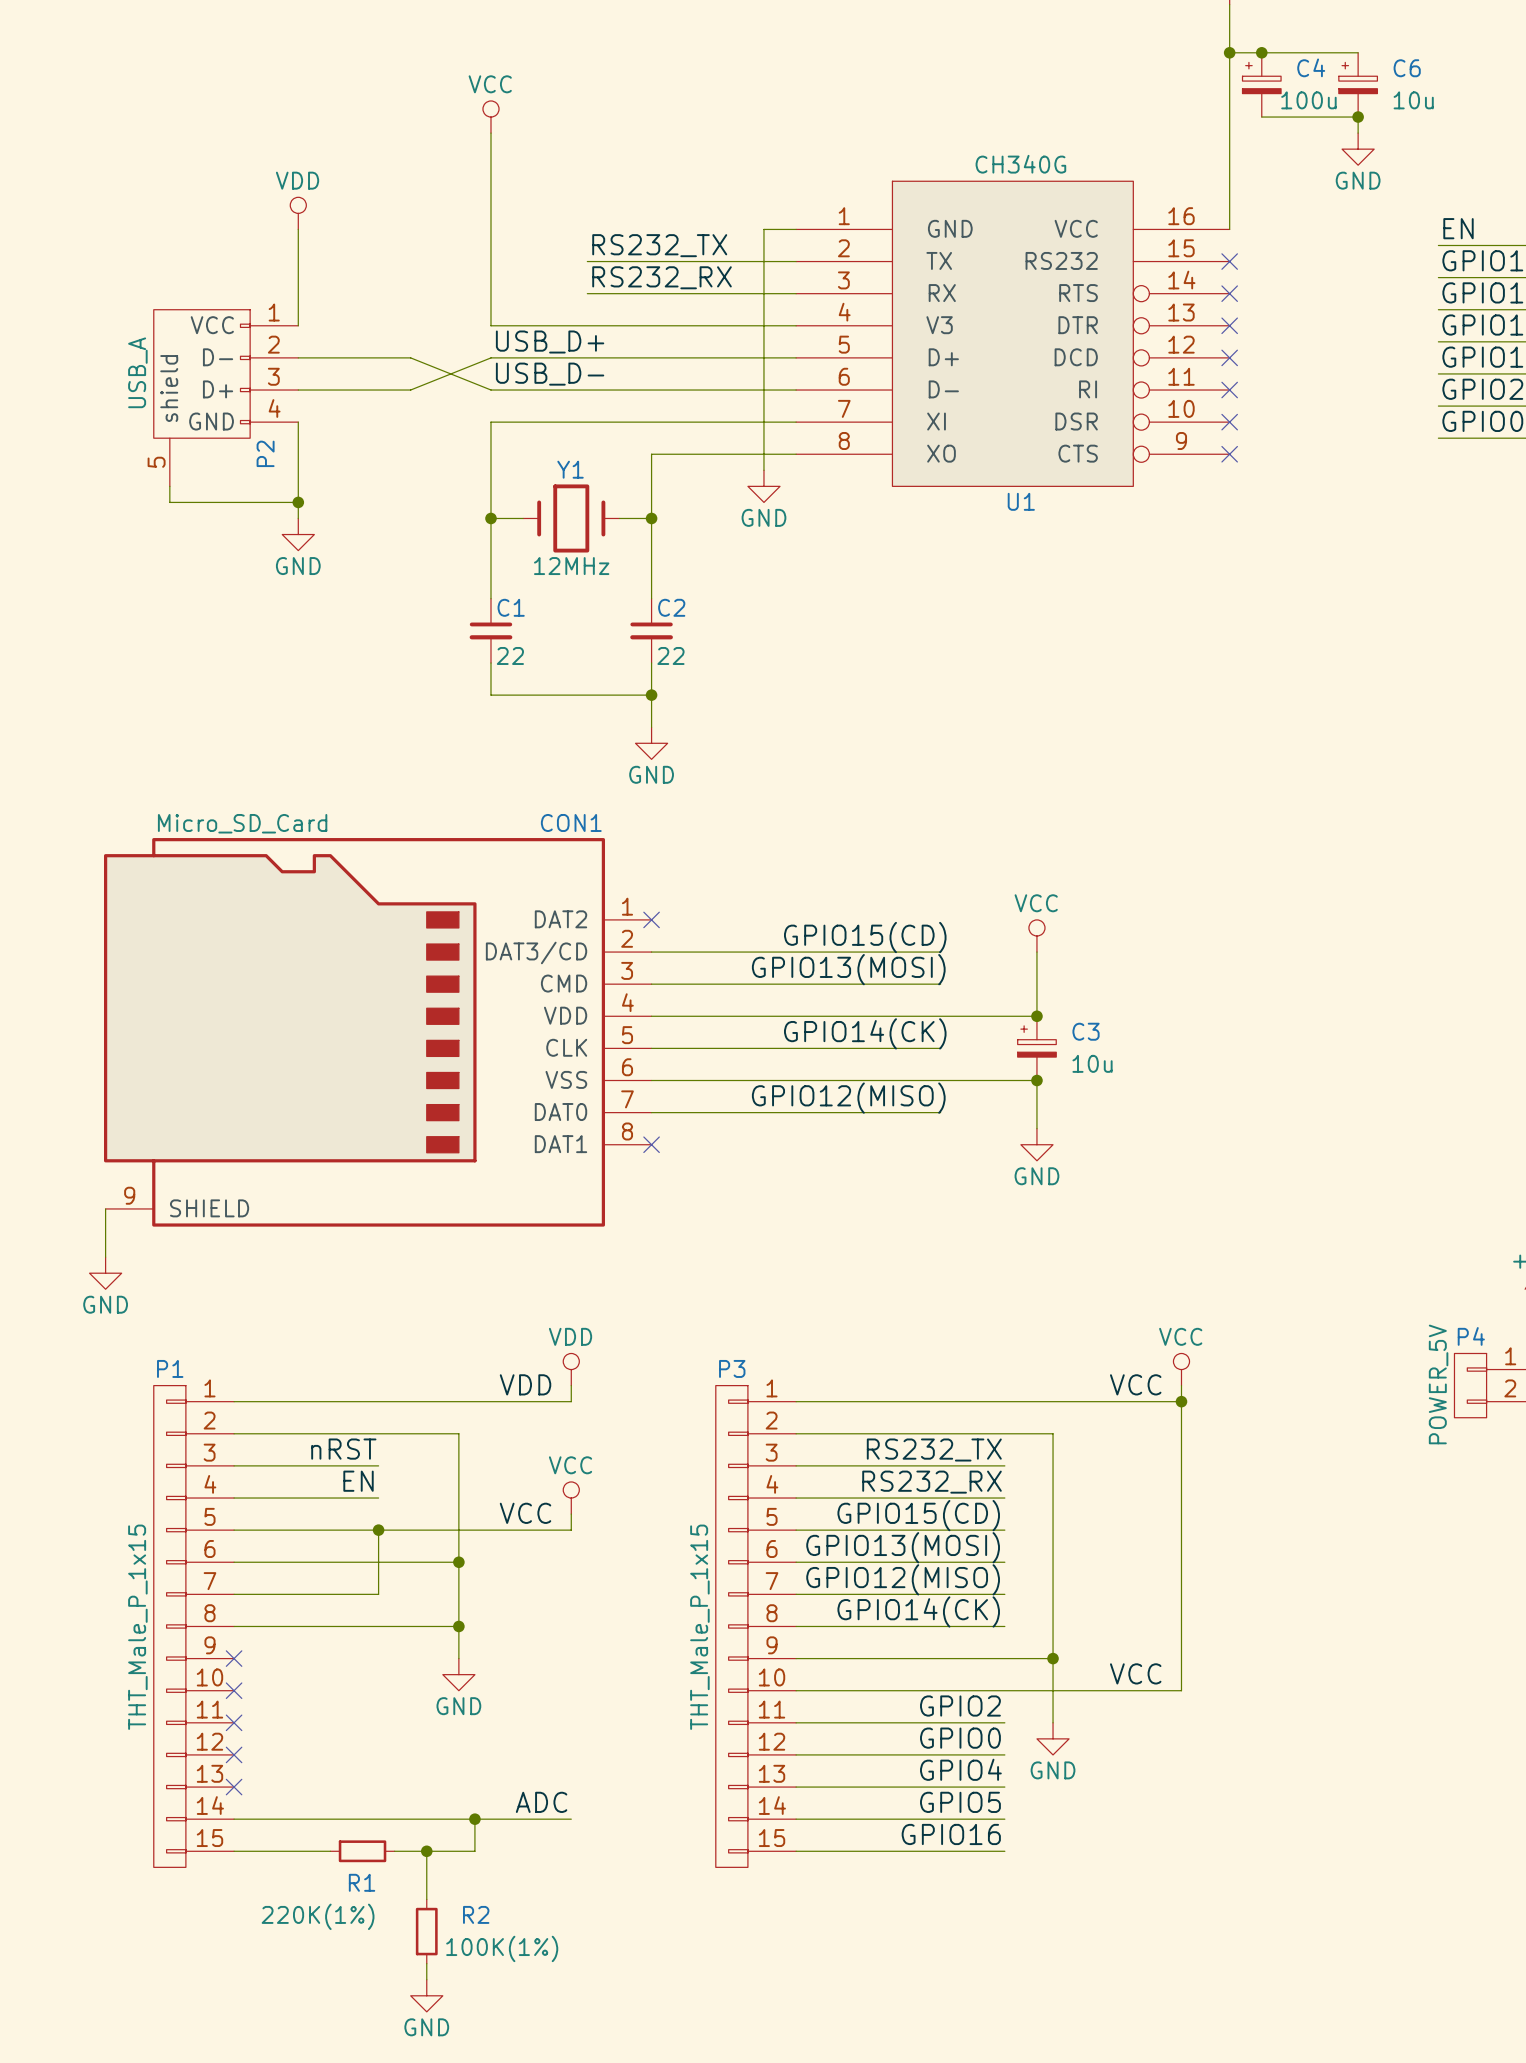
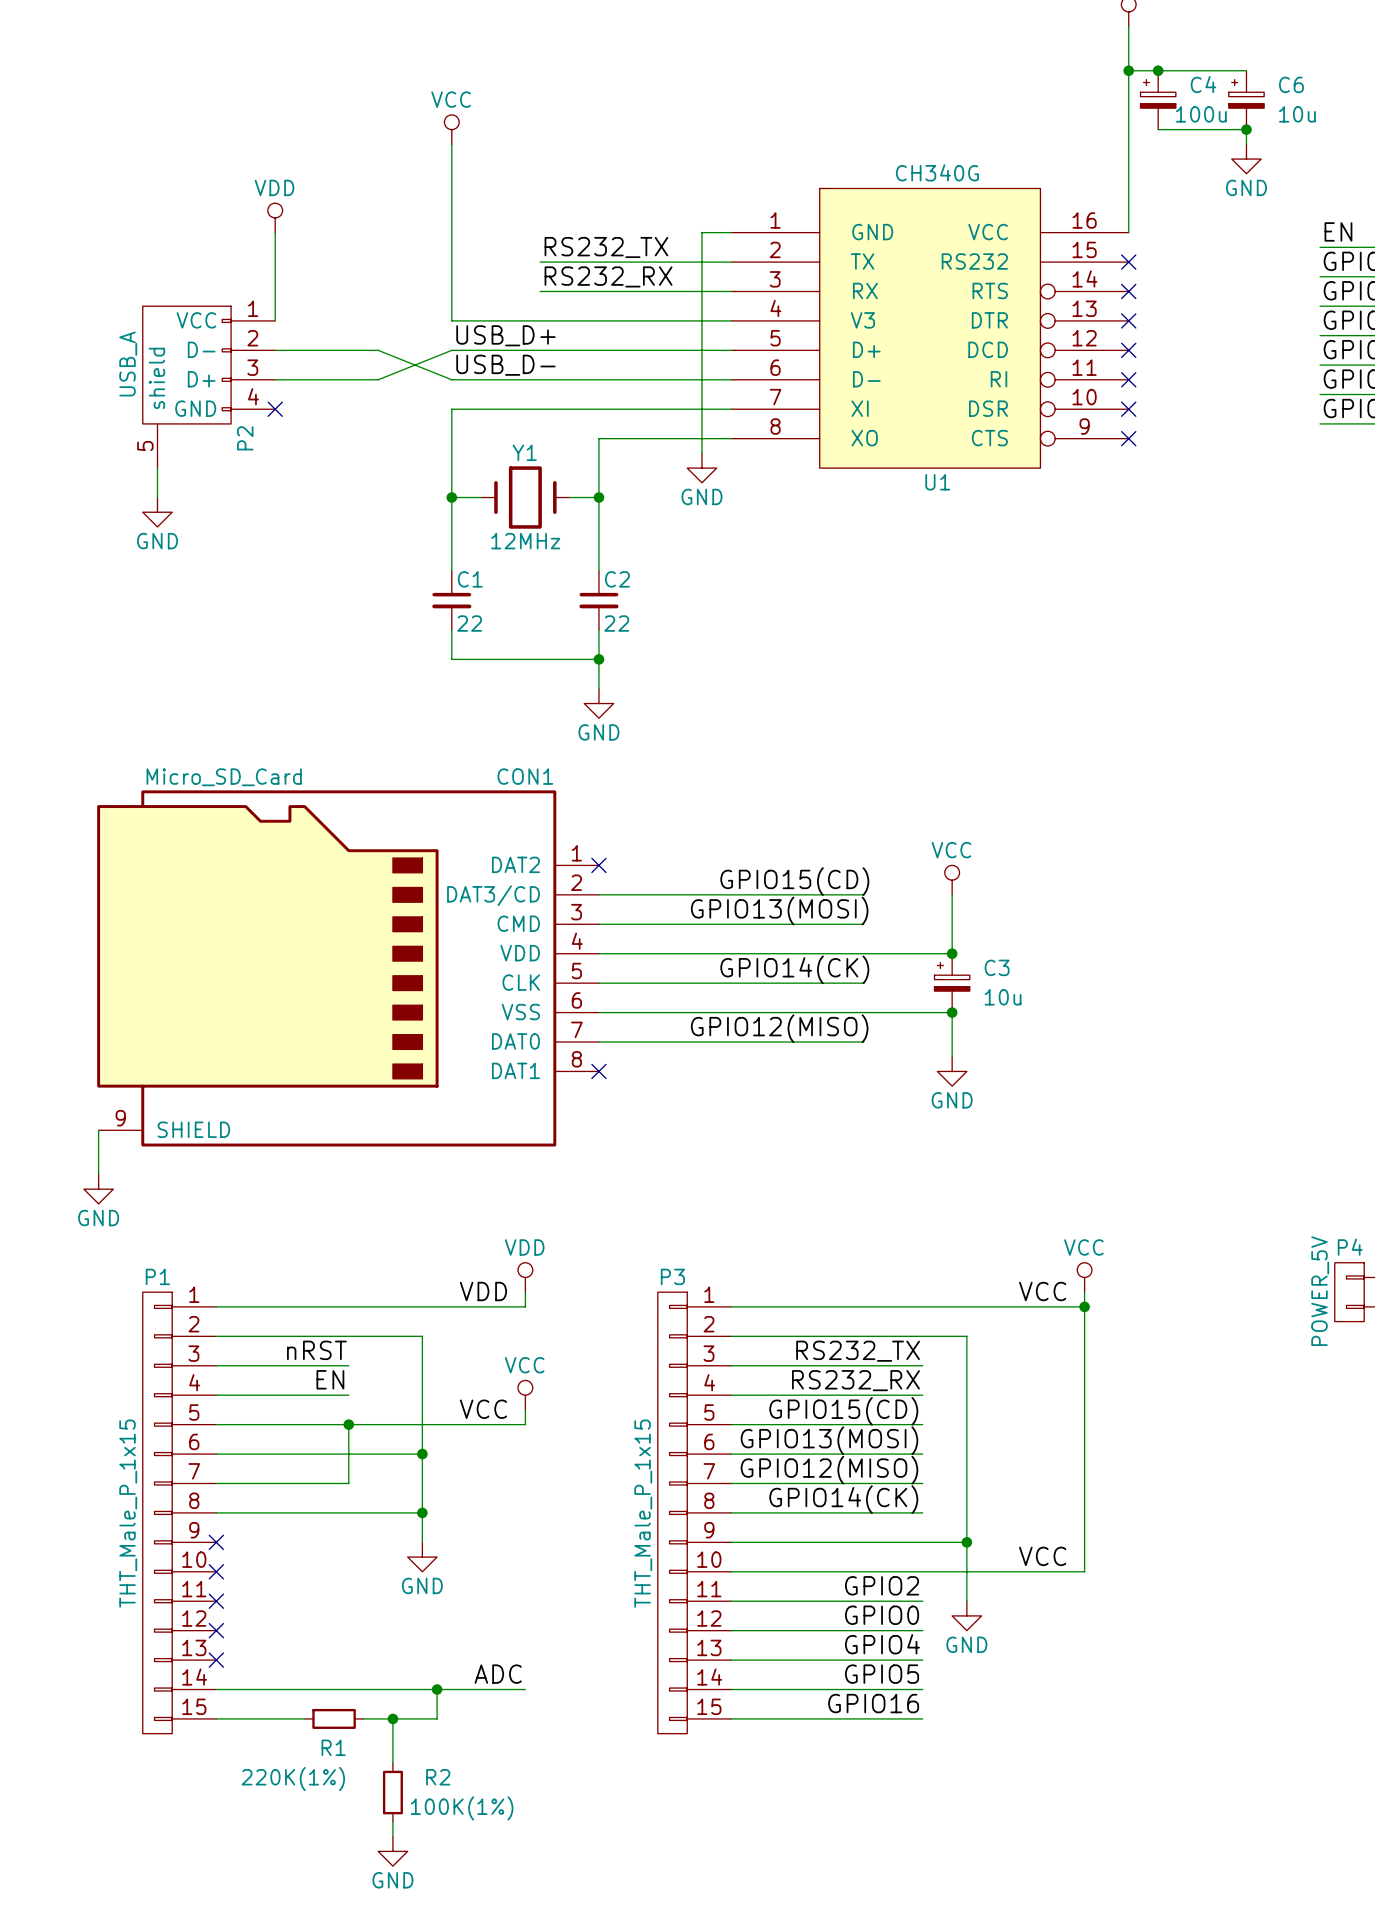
wire: (298, 422) (298, 518) -> none
no-connect mark: none -> (275, 409)
wire: (169, 502) (298, 502) -> (157, 482) (157, 497)
junction: (298, 502) -> none
power symbol position: GND (298, 534) -> GND (157, 512)

